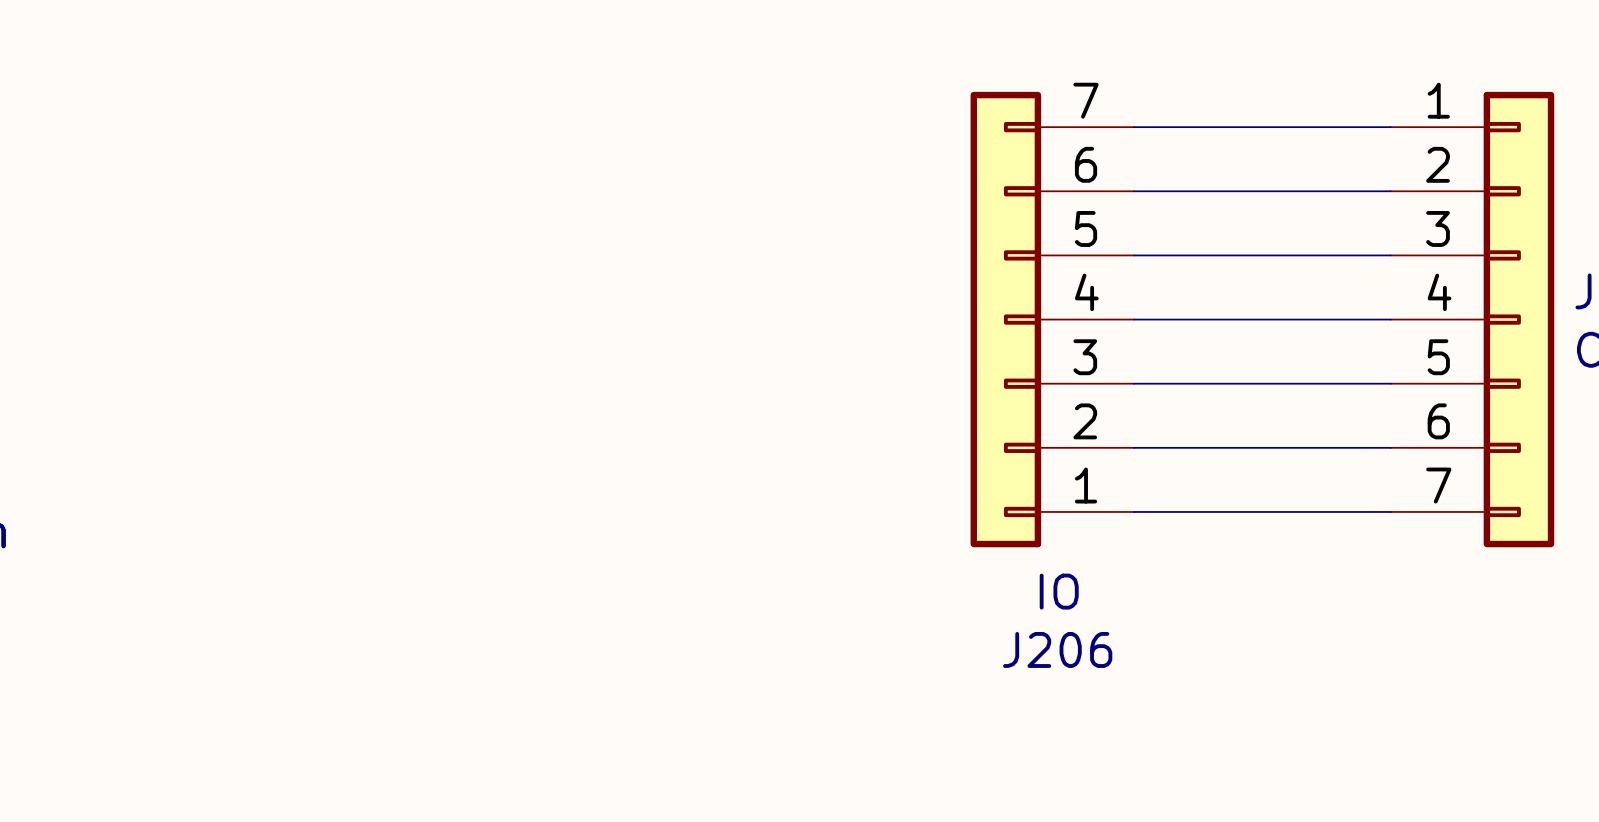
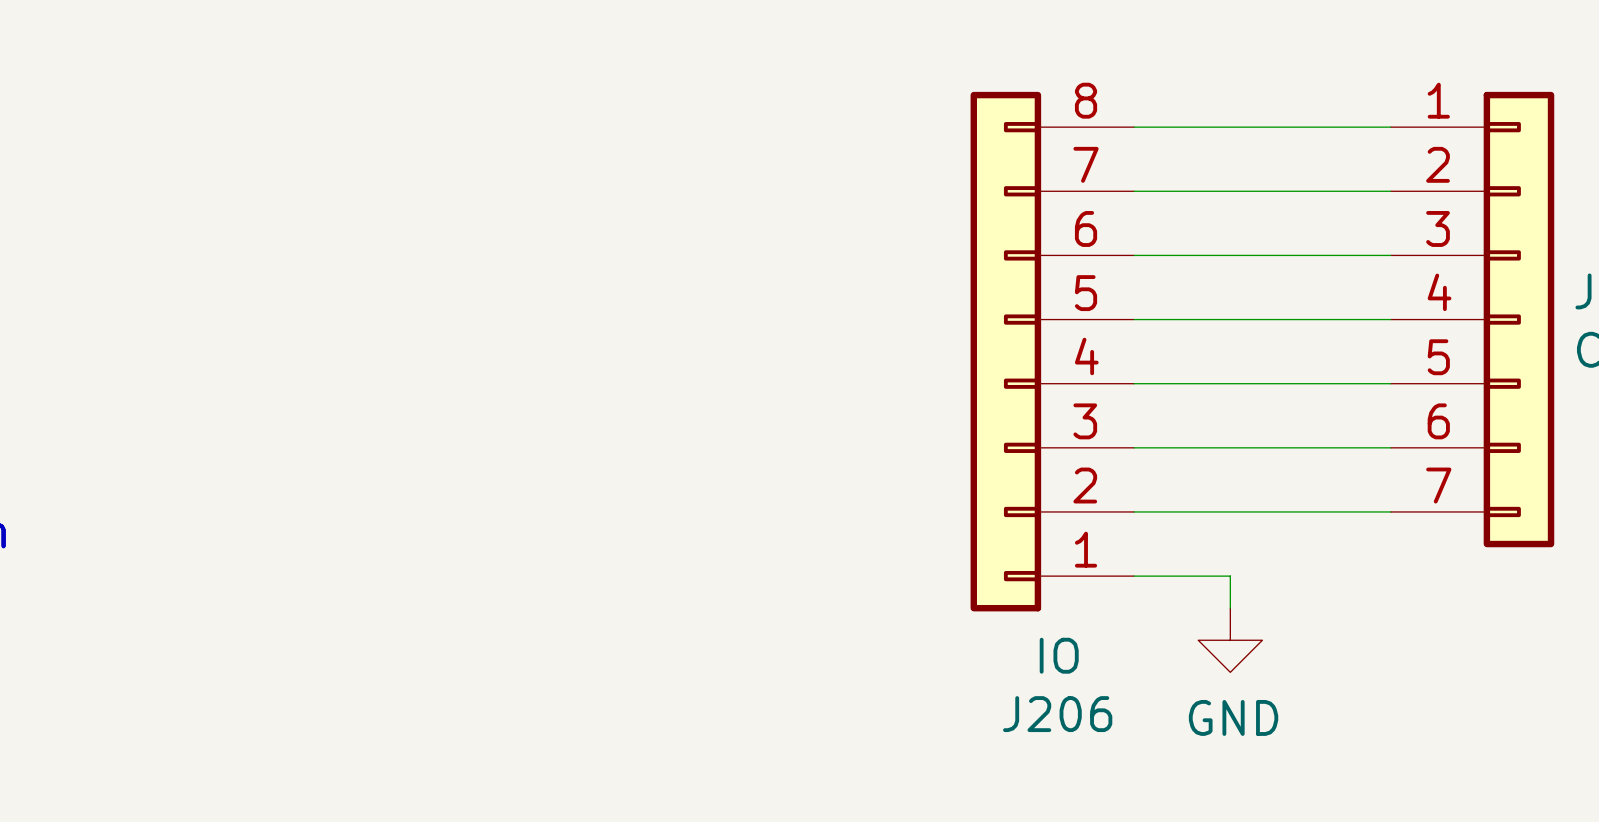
J206 symbol: [970, 91, 1135, 548] -> [970, 91, 1135, 612]
wire: none -> (1134, 576) (1230, 576) (1230, 608)
power symbol: none -> GND (1230, 640)

